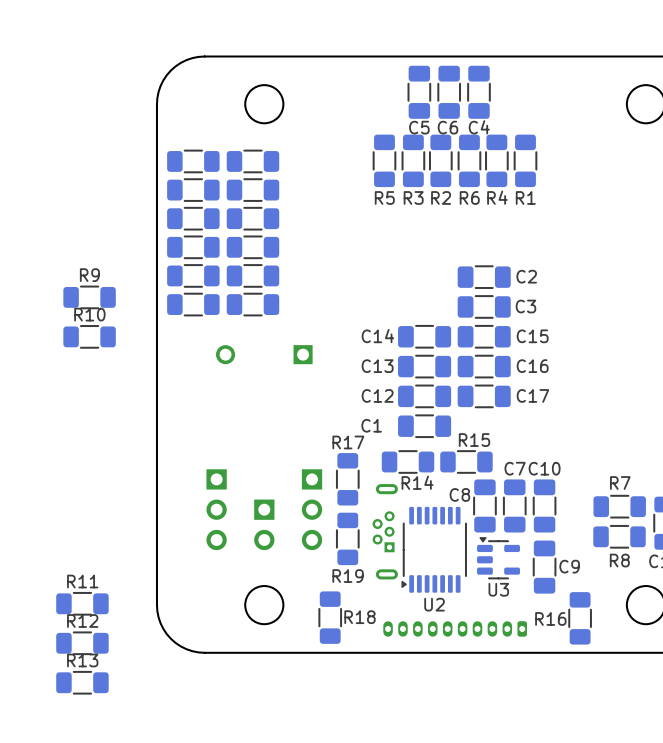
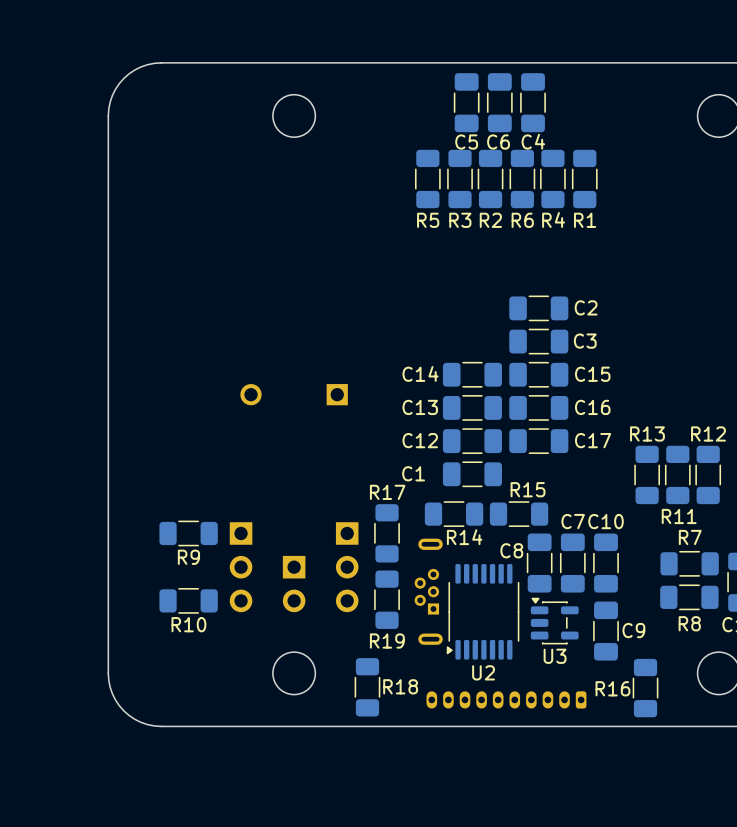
board edge: (204, 56) (186, 60) (170, 70) (160, 85) (156, 104) (157, 611) (163, 628) (175, 642) (192, 651) (204, 652) -> (227, 62) (161, 62) (141, 66) (123, 78) (115, 89) (110, 102) (108, 115) (108, 680) (112, 693) (119, 705) (129, 715) (141, 722) (161, 726) (227, 726)
part: (193, 161) -> none
part: (252, 161) -> none
part: (193, 190) -> none
part: (252, 190) -> none
part: (193, 218) -> none
part: (252, 218) -> none
part: (193, 247) -> none
part: (252, 247) -> none
R9 name position: R9 (89, 275) -> R9 (188, 557)
part: (193, 275) -> none
part: (252, 275) -> none
R9 position: (89, 297) -> (188, 533)
part: (193, 304) -> none
part: (252, 304) -> none
R10 name position: R10 (89, 314) -> R10 (188, 624)
R10 position: (89, 336) -> (188, 600)
U3 footprint: [477, 537, 520, 580] -> [530, 597, 579, 645]
R11 name position: R11 (82, 581) -> R11 (679, 516)
R11 rotation: 0° (82, 603) -> 90° clockwise (677, 474)
R11 position: (82, 603) -> (677, 474)
R12 rotation: 0° (82, 643) -> 90° clockwise (708, 474)
R12 position: (82, 643) -> (708, 474)
R13 rotation: 0° (82, 682) -> 90° clockwise (647, 474)
R13 position: (82, 682) -> (647, 474)

